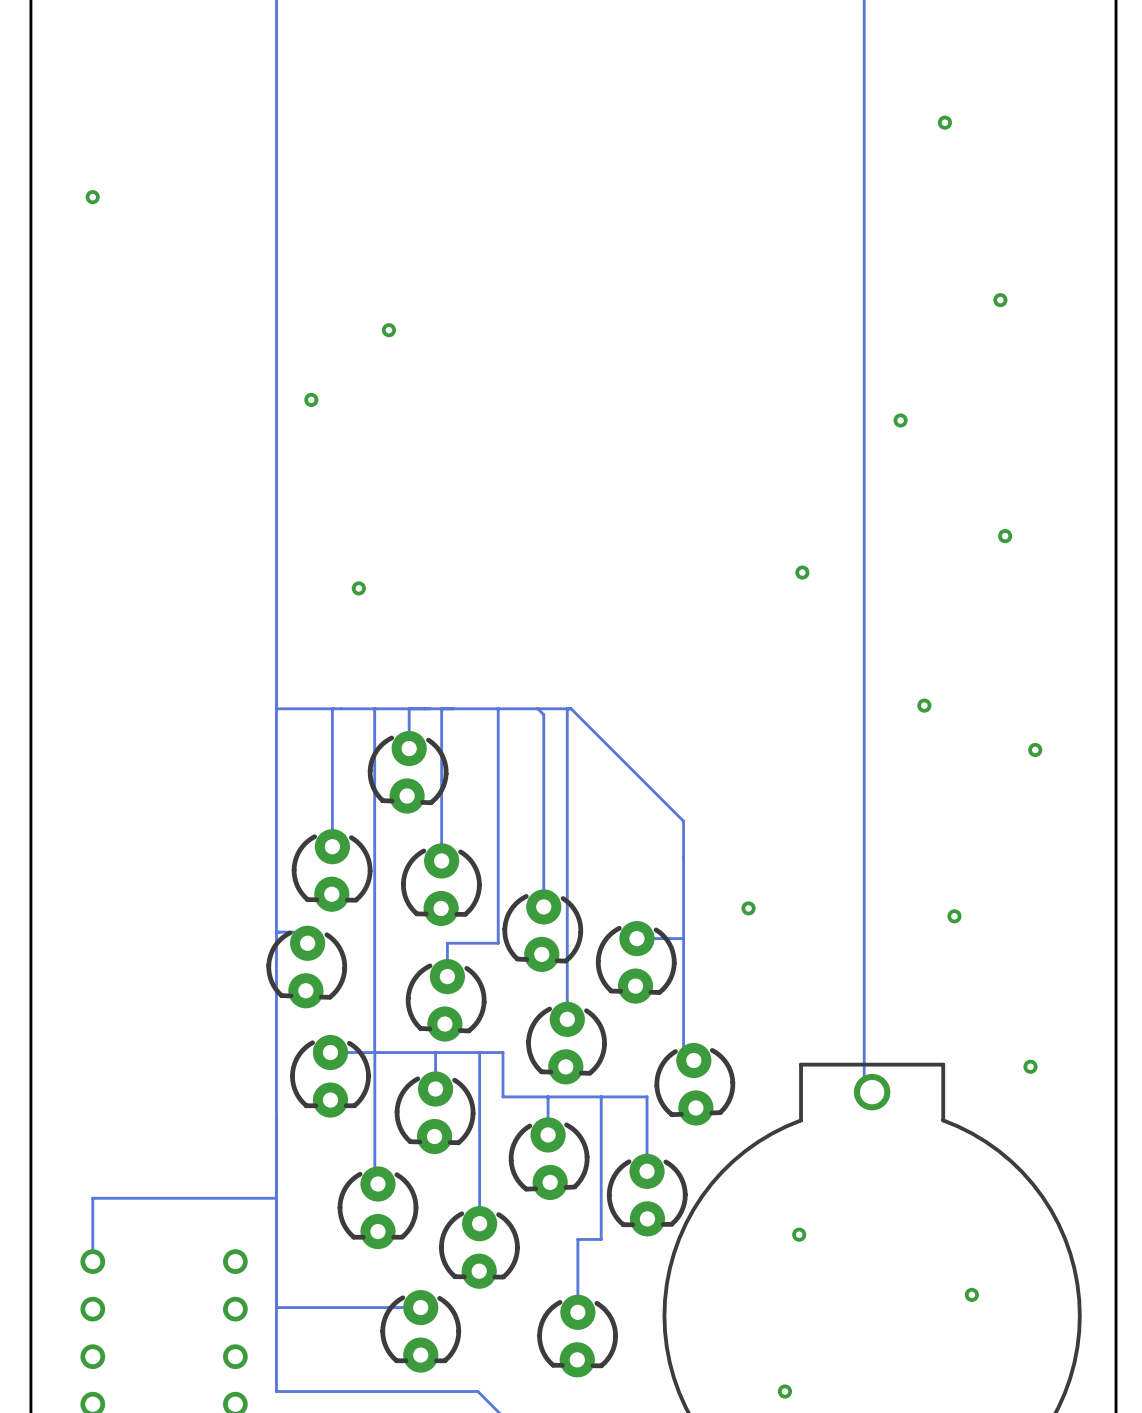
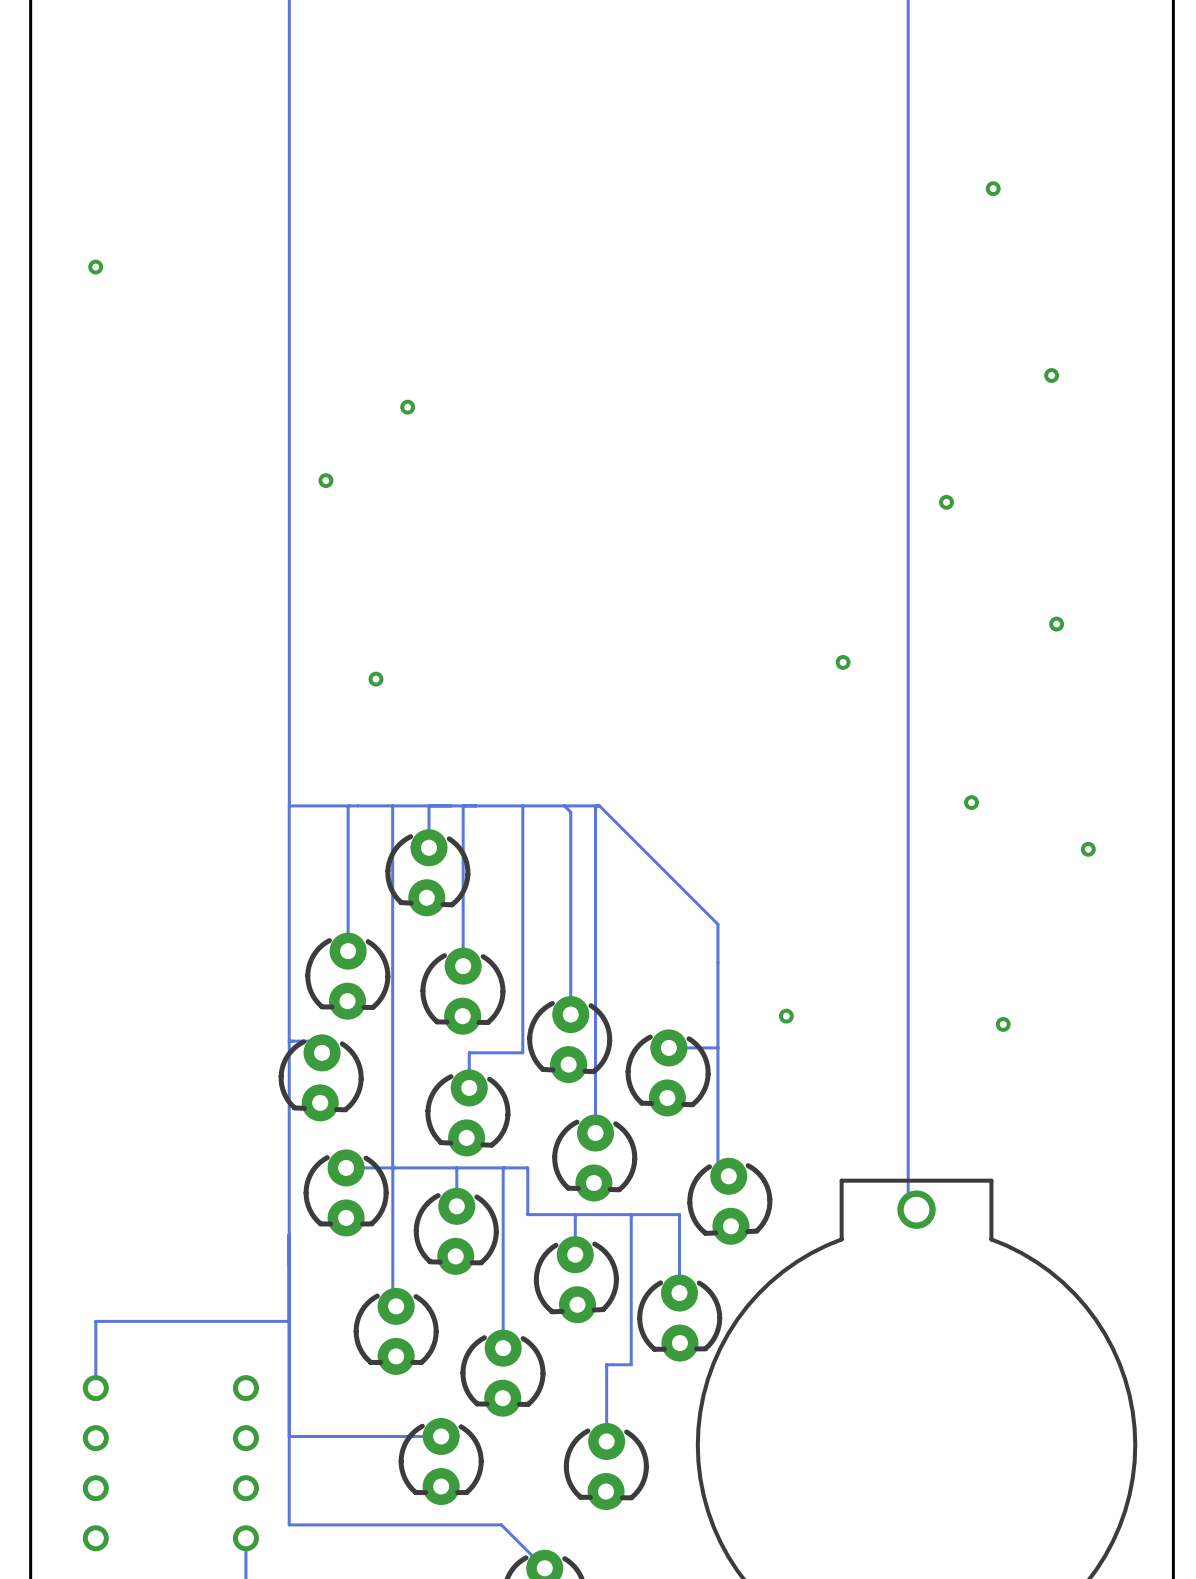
via: (1030, 1066) -> none
via: (799, 1234) -> none
via: (971, 1294) -> none
via: (784, 1391) -> none

